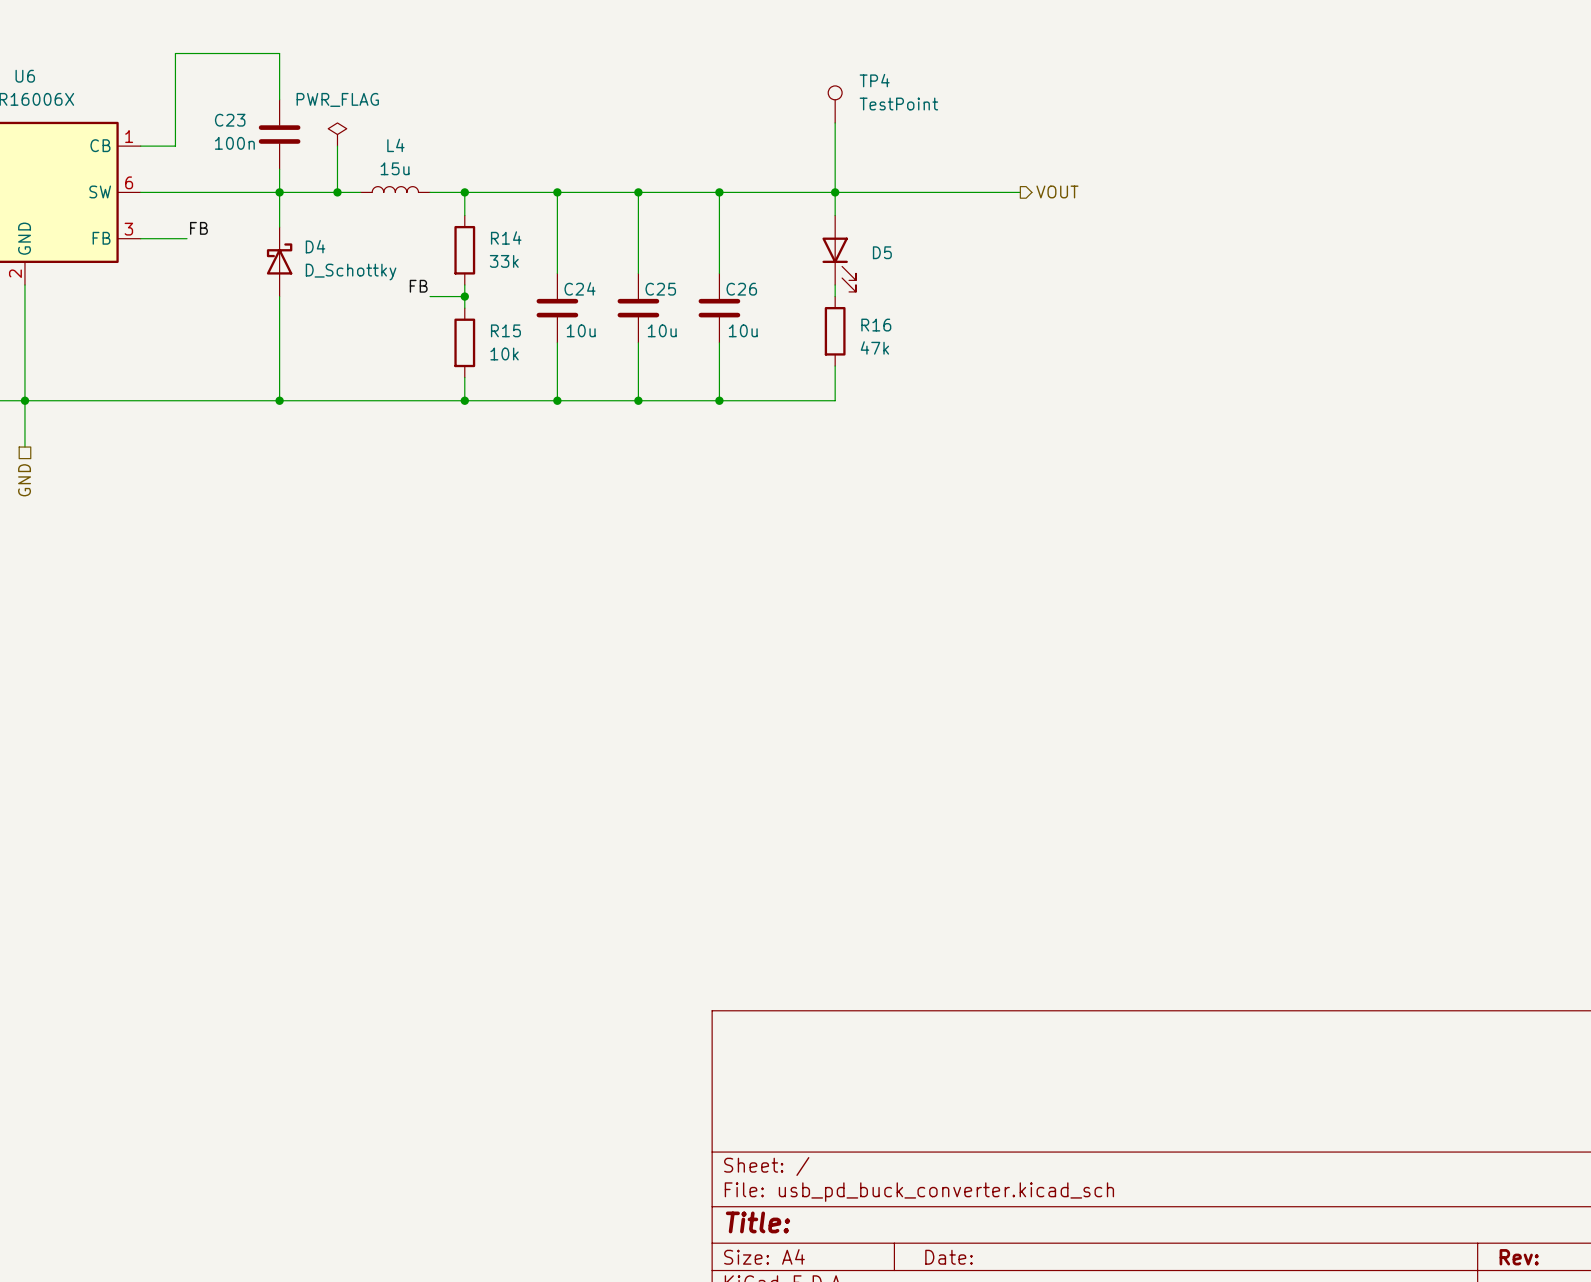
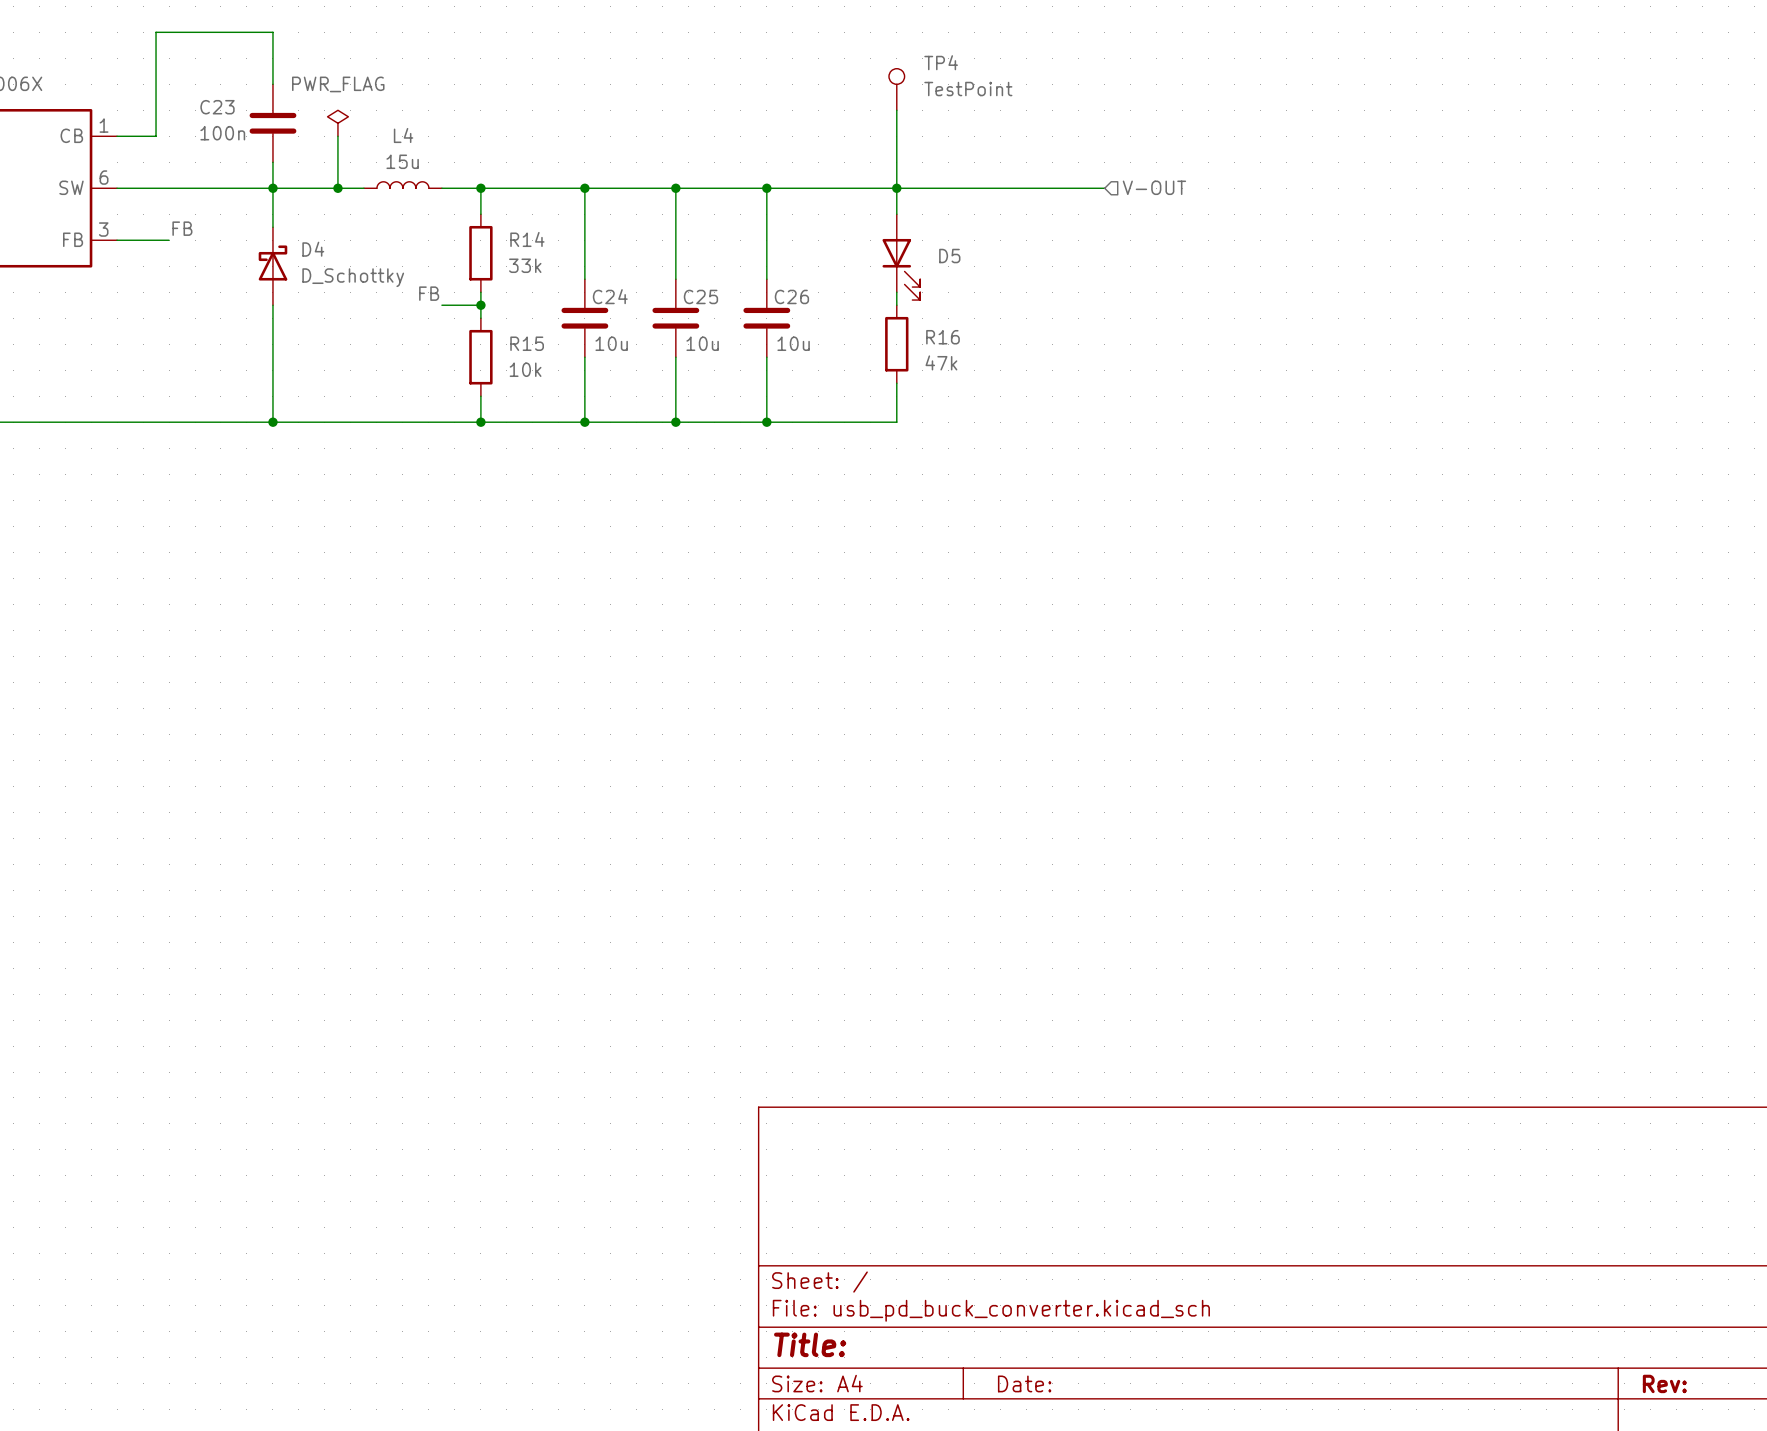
hierarchical label shape: output (1057, 191) -> input (1154, 187)
hierarchical label: VOUT (1057, 191) -> V-OUT (1154, 187)

